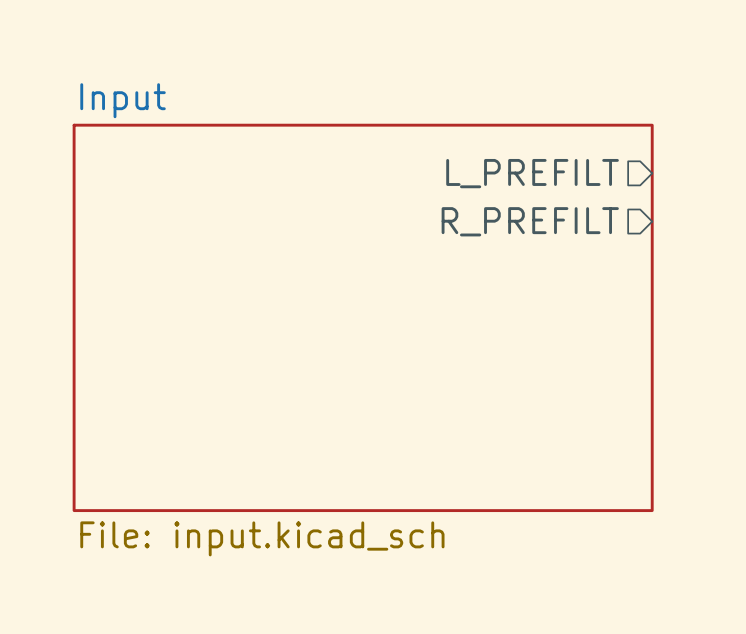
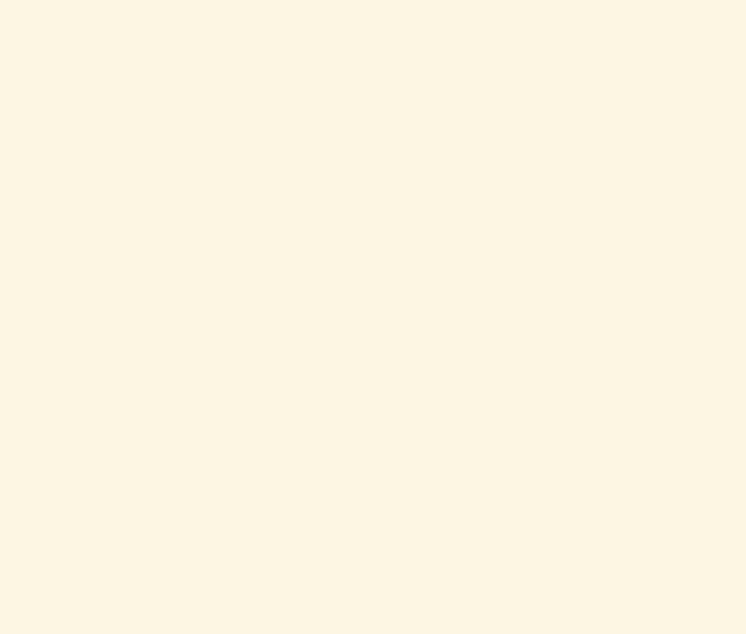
sheet pin: L_PREFILT (532, 173) -> none
sheet pin: R_PREFILT (530, 221) -> none
sheet Input: File: input.kicad_sch (363, 317) -> none

